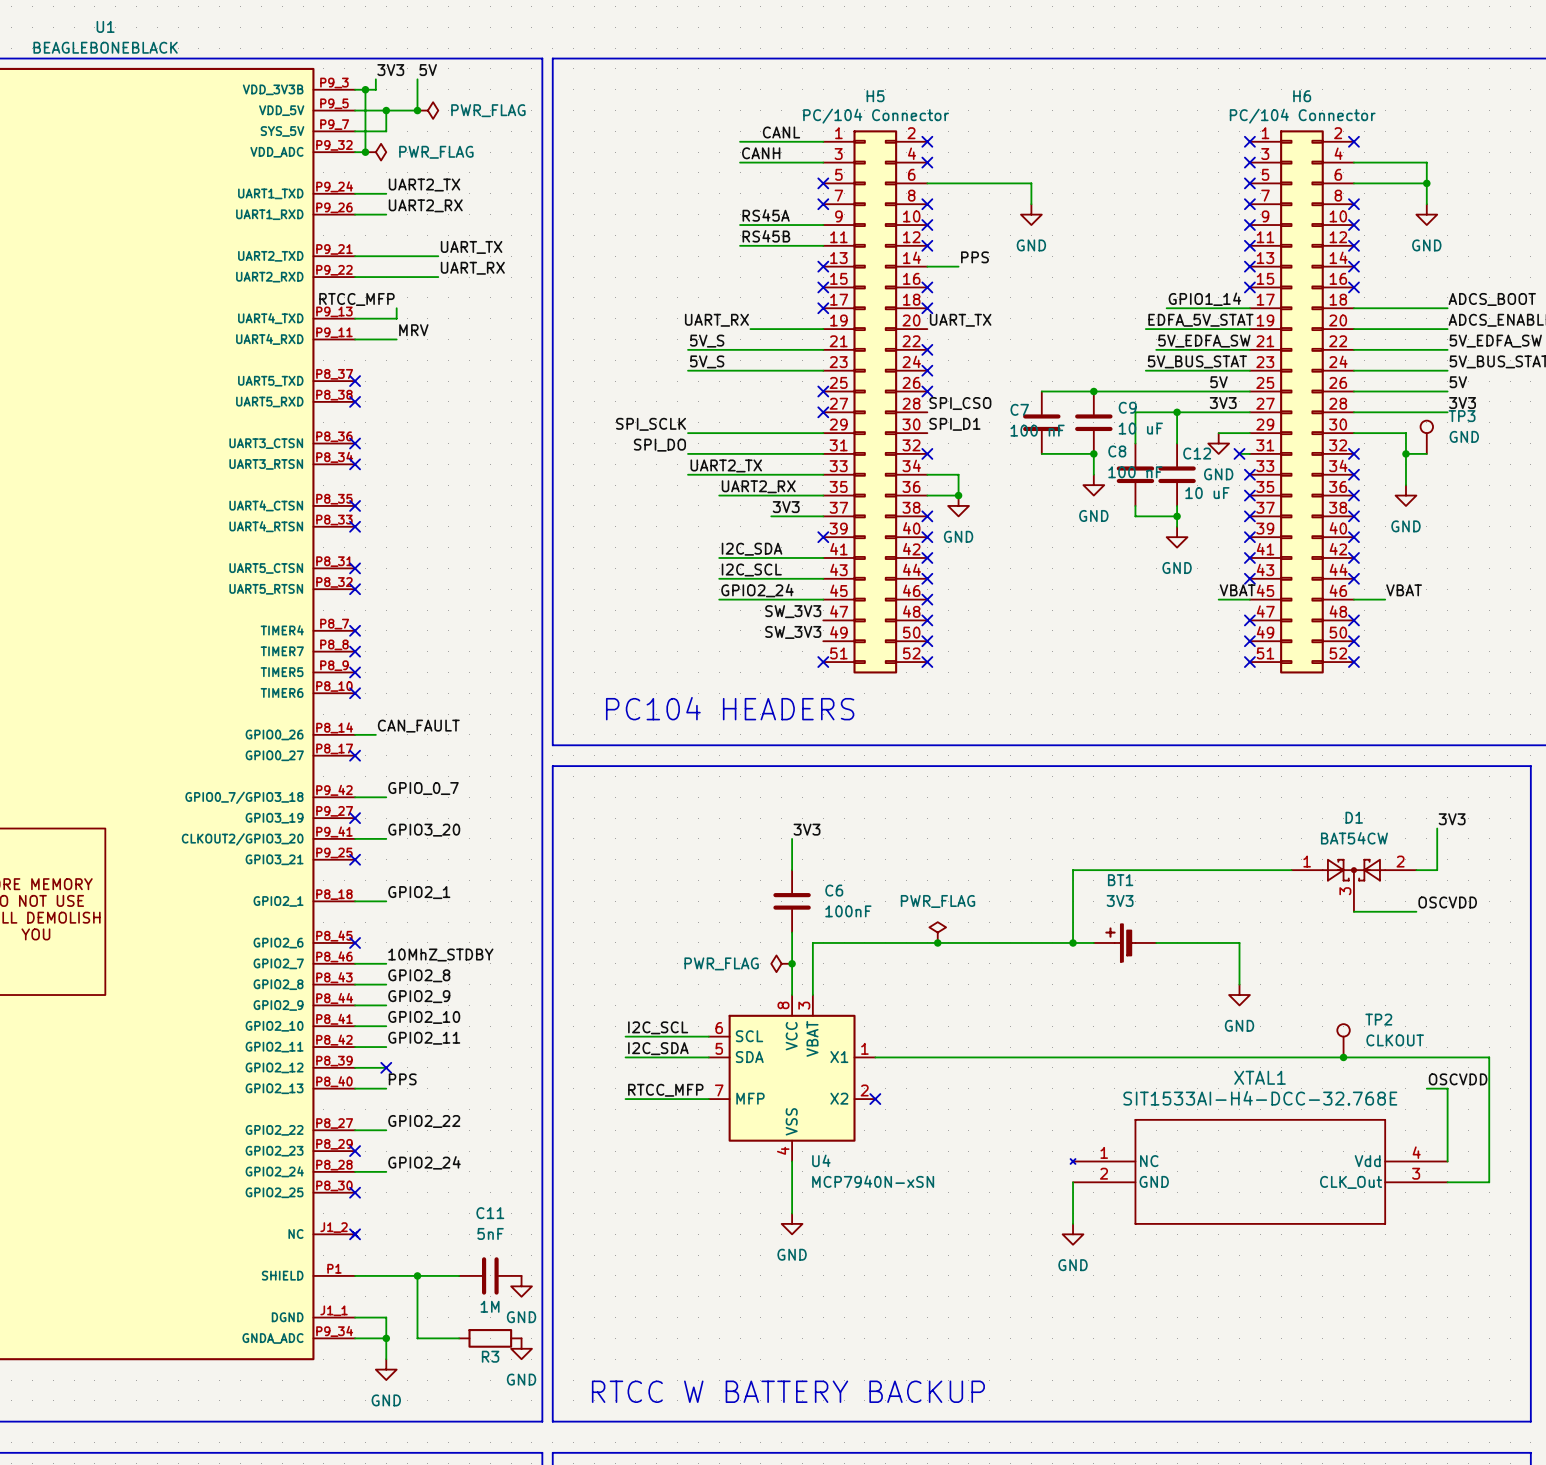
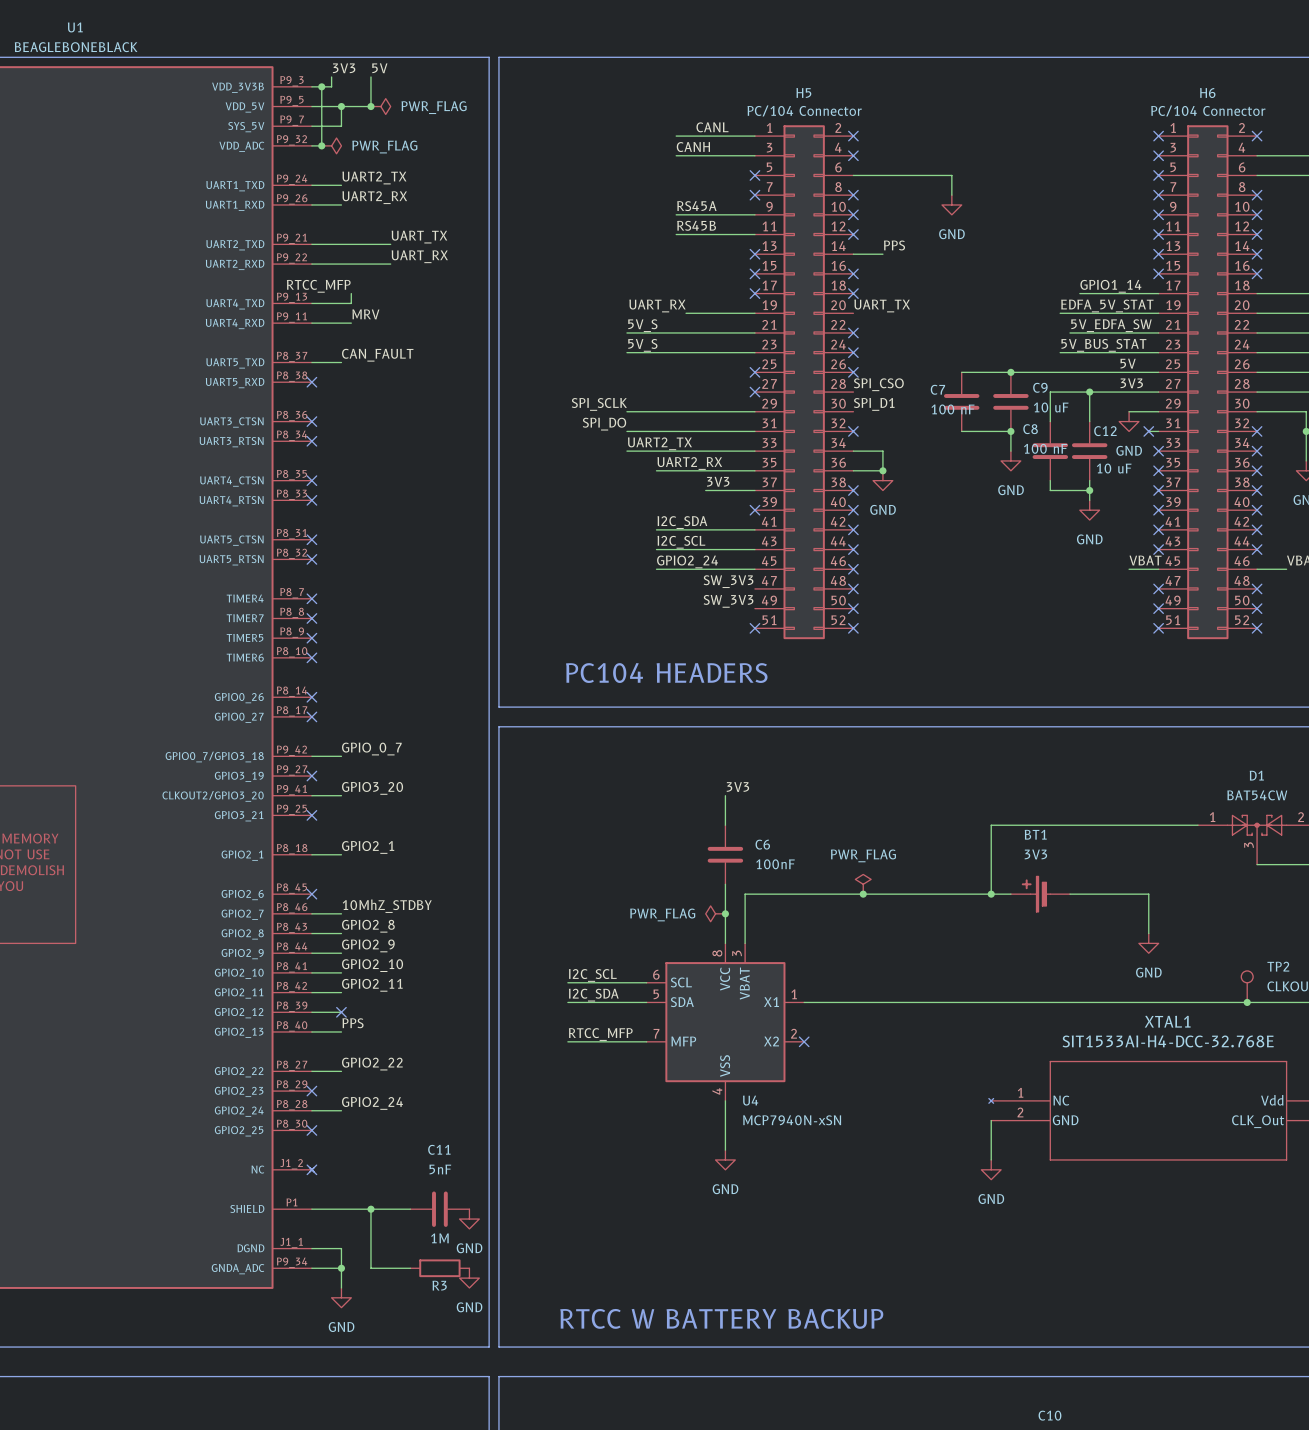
label: none -> CAN_FAULT (377, 355)
wire: none -> (311, 362) (341, 362)
no-connect mark: (355, 381) -> none
label: CAN_FAULT (418, 726) -> none
wire: (355, 734) (375, 734) -> none
no-connect mark: none -> (311, 697)

